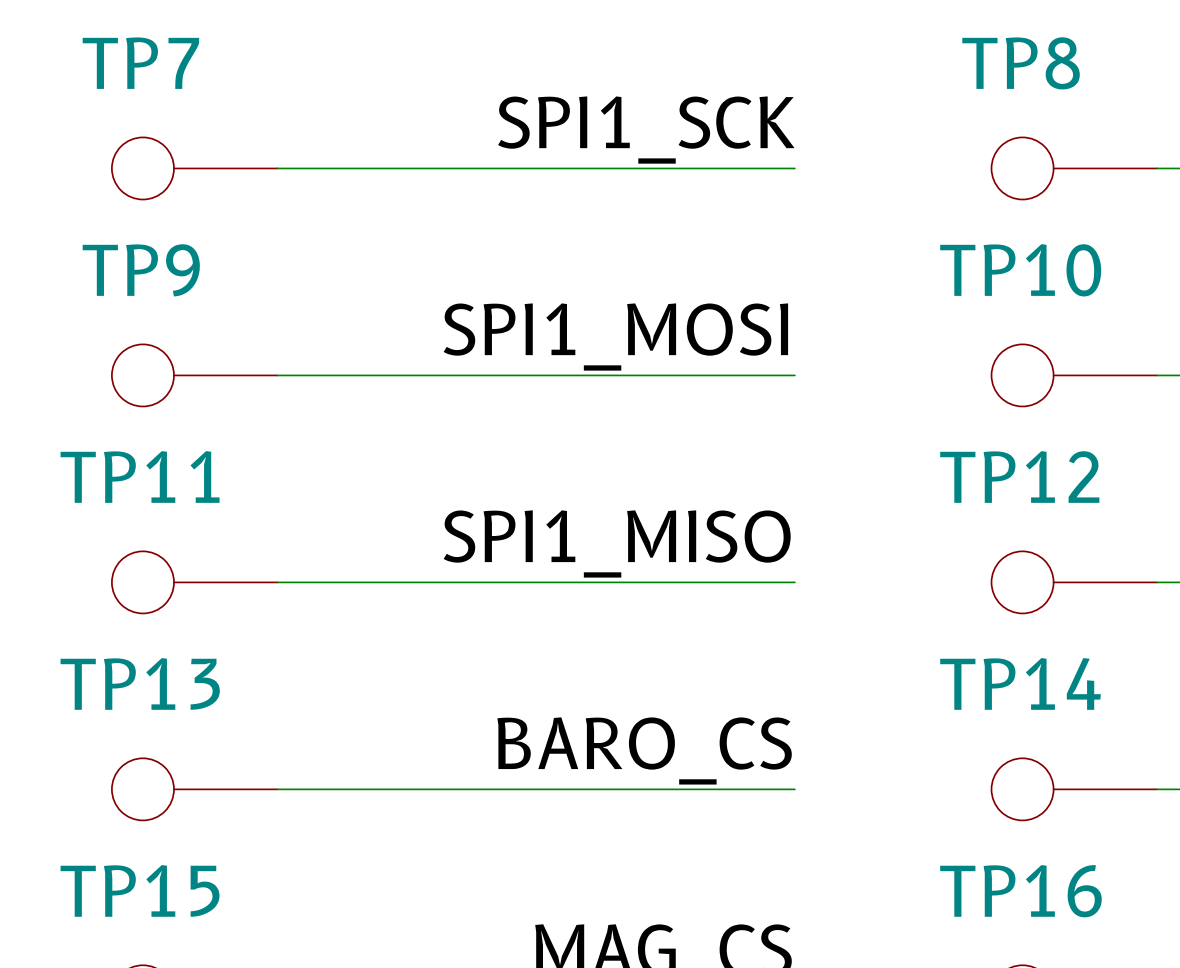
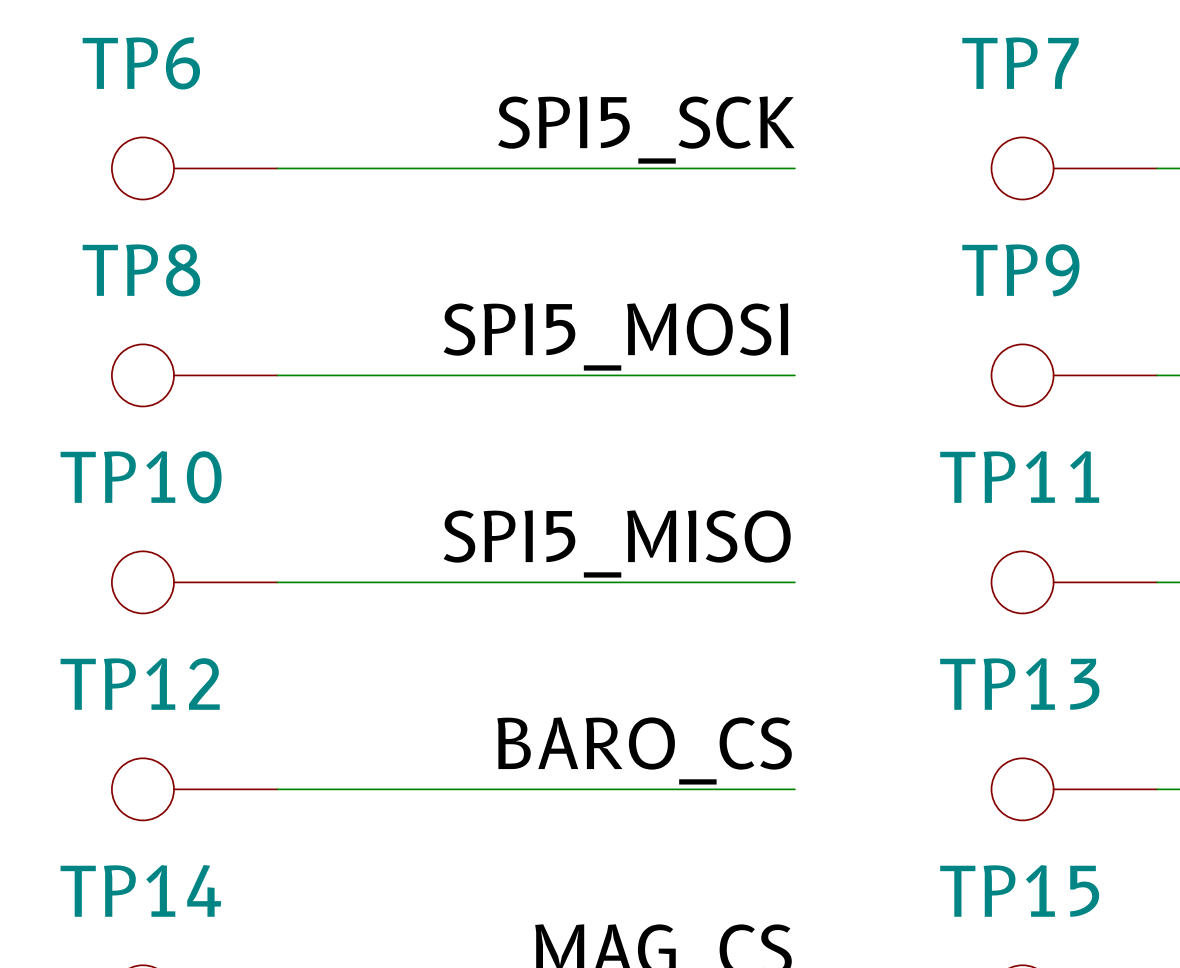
TP7 name: TP7 (140, 63) -> TP6 (141, 63)
TP8 name: TP8 (1021, 63) -> TP7 (1020, 63)
label: SPI1_SCK (646, 130) -> SPI5_SCK (646, 130)
TP9 name: TP9 (141, 270) -> TP8 (141, 270)
TP10 name: TP10 (1020, 270) -> TP9 (1020, 270)
label: SPI1_MOSI (615, 337) -> SPI5_MOSI (615, 337)
TP11 name: TP11 (140, 476) -> TP10 (141, 477)
TP12 name: TP12 (1019, 476) -> TP11 (1019, 476)
label: SPI1_MISO (617, 543) -> SPI5_MISO (617, 543)
TP13 name: TP13 (140, 683) -> TP12 (140, 683)
TP14 name: TP14 (1020, 683) -> TP13 (1019, 683)
TP15 name: TP15 (140, 890) -> TP14 (140, 890)
TP16 name: TP16 (1020, 891) -> TP15 (1019, 890)

